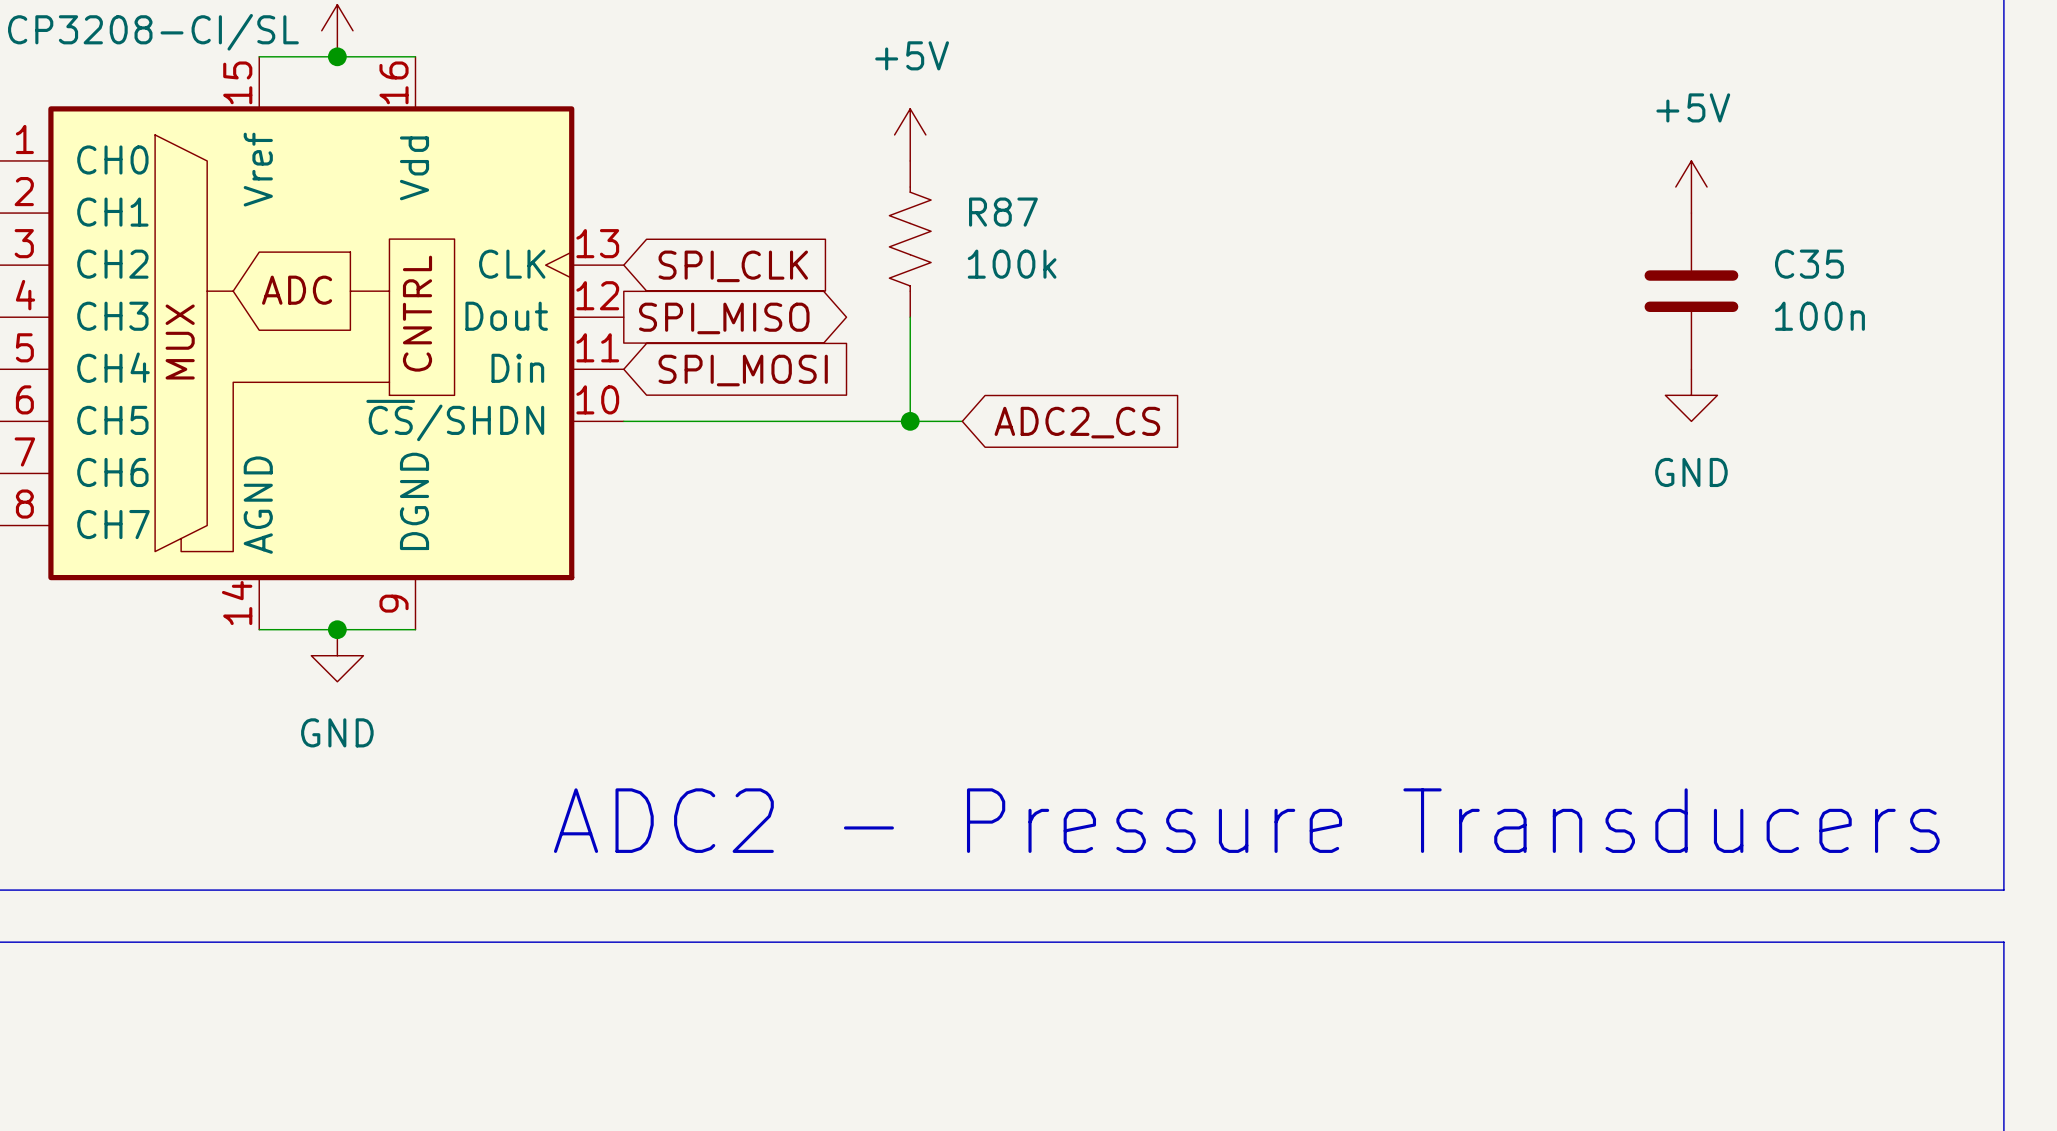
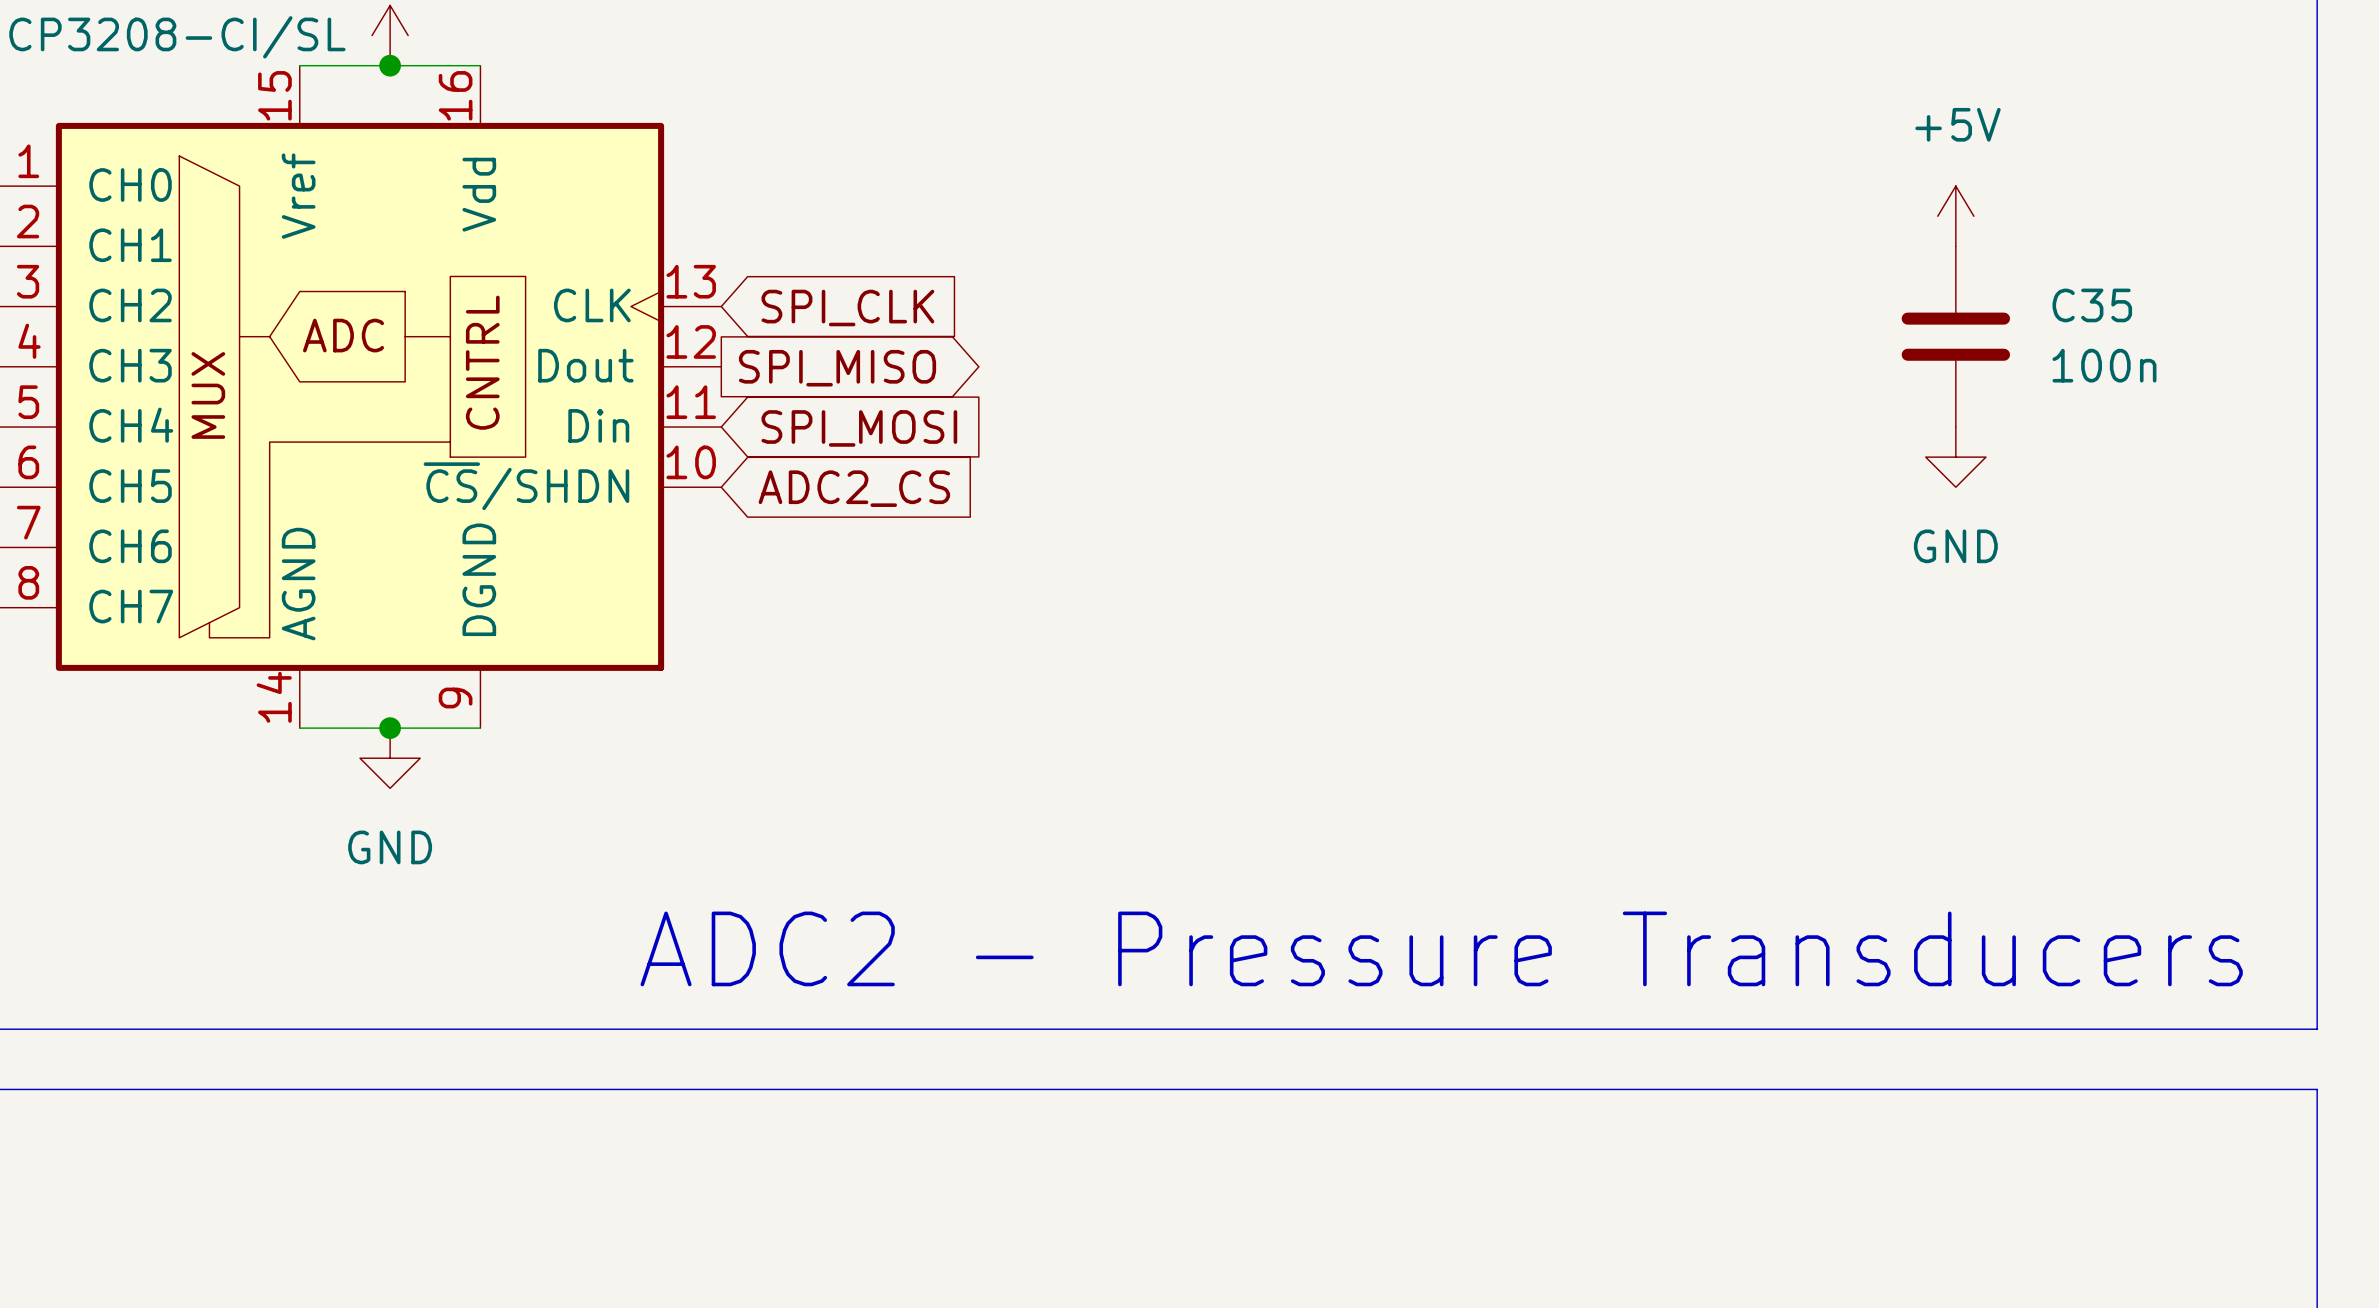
power symbol: +5V (910, 134) -> none
R87: 100k (910, 239) -> none
wire: (910, 317) (910, 421) -> none
wire: (623, 421) (962, 421) -> none
junction: (910, 421) -> none
global label position: ADC2_CS (1077, 422) -> ADC2_CS (854, 488)

